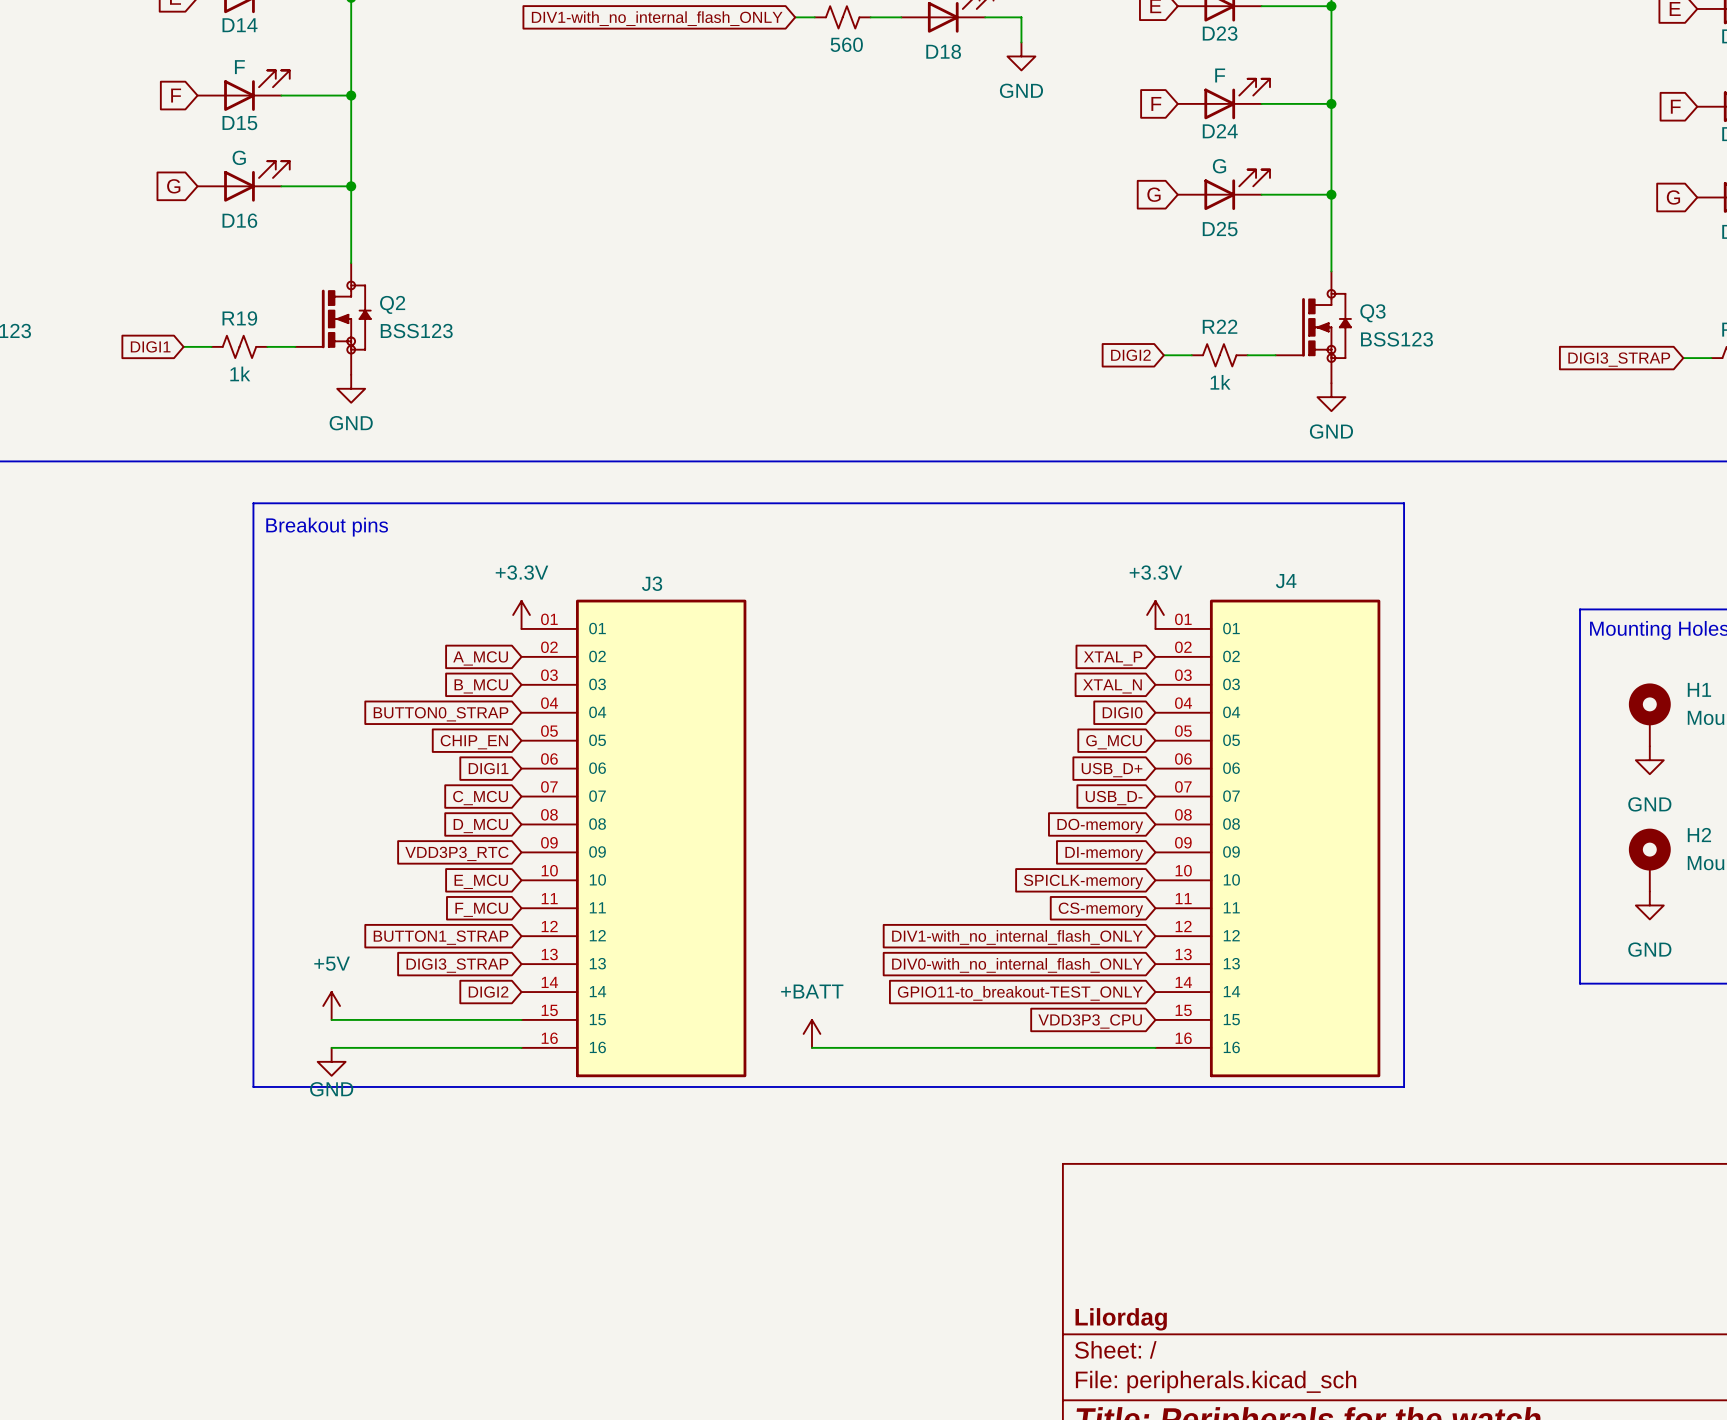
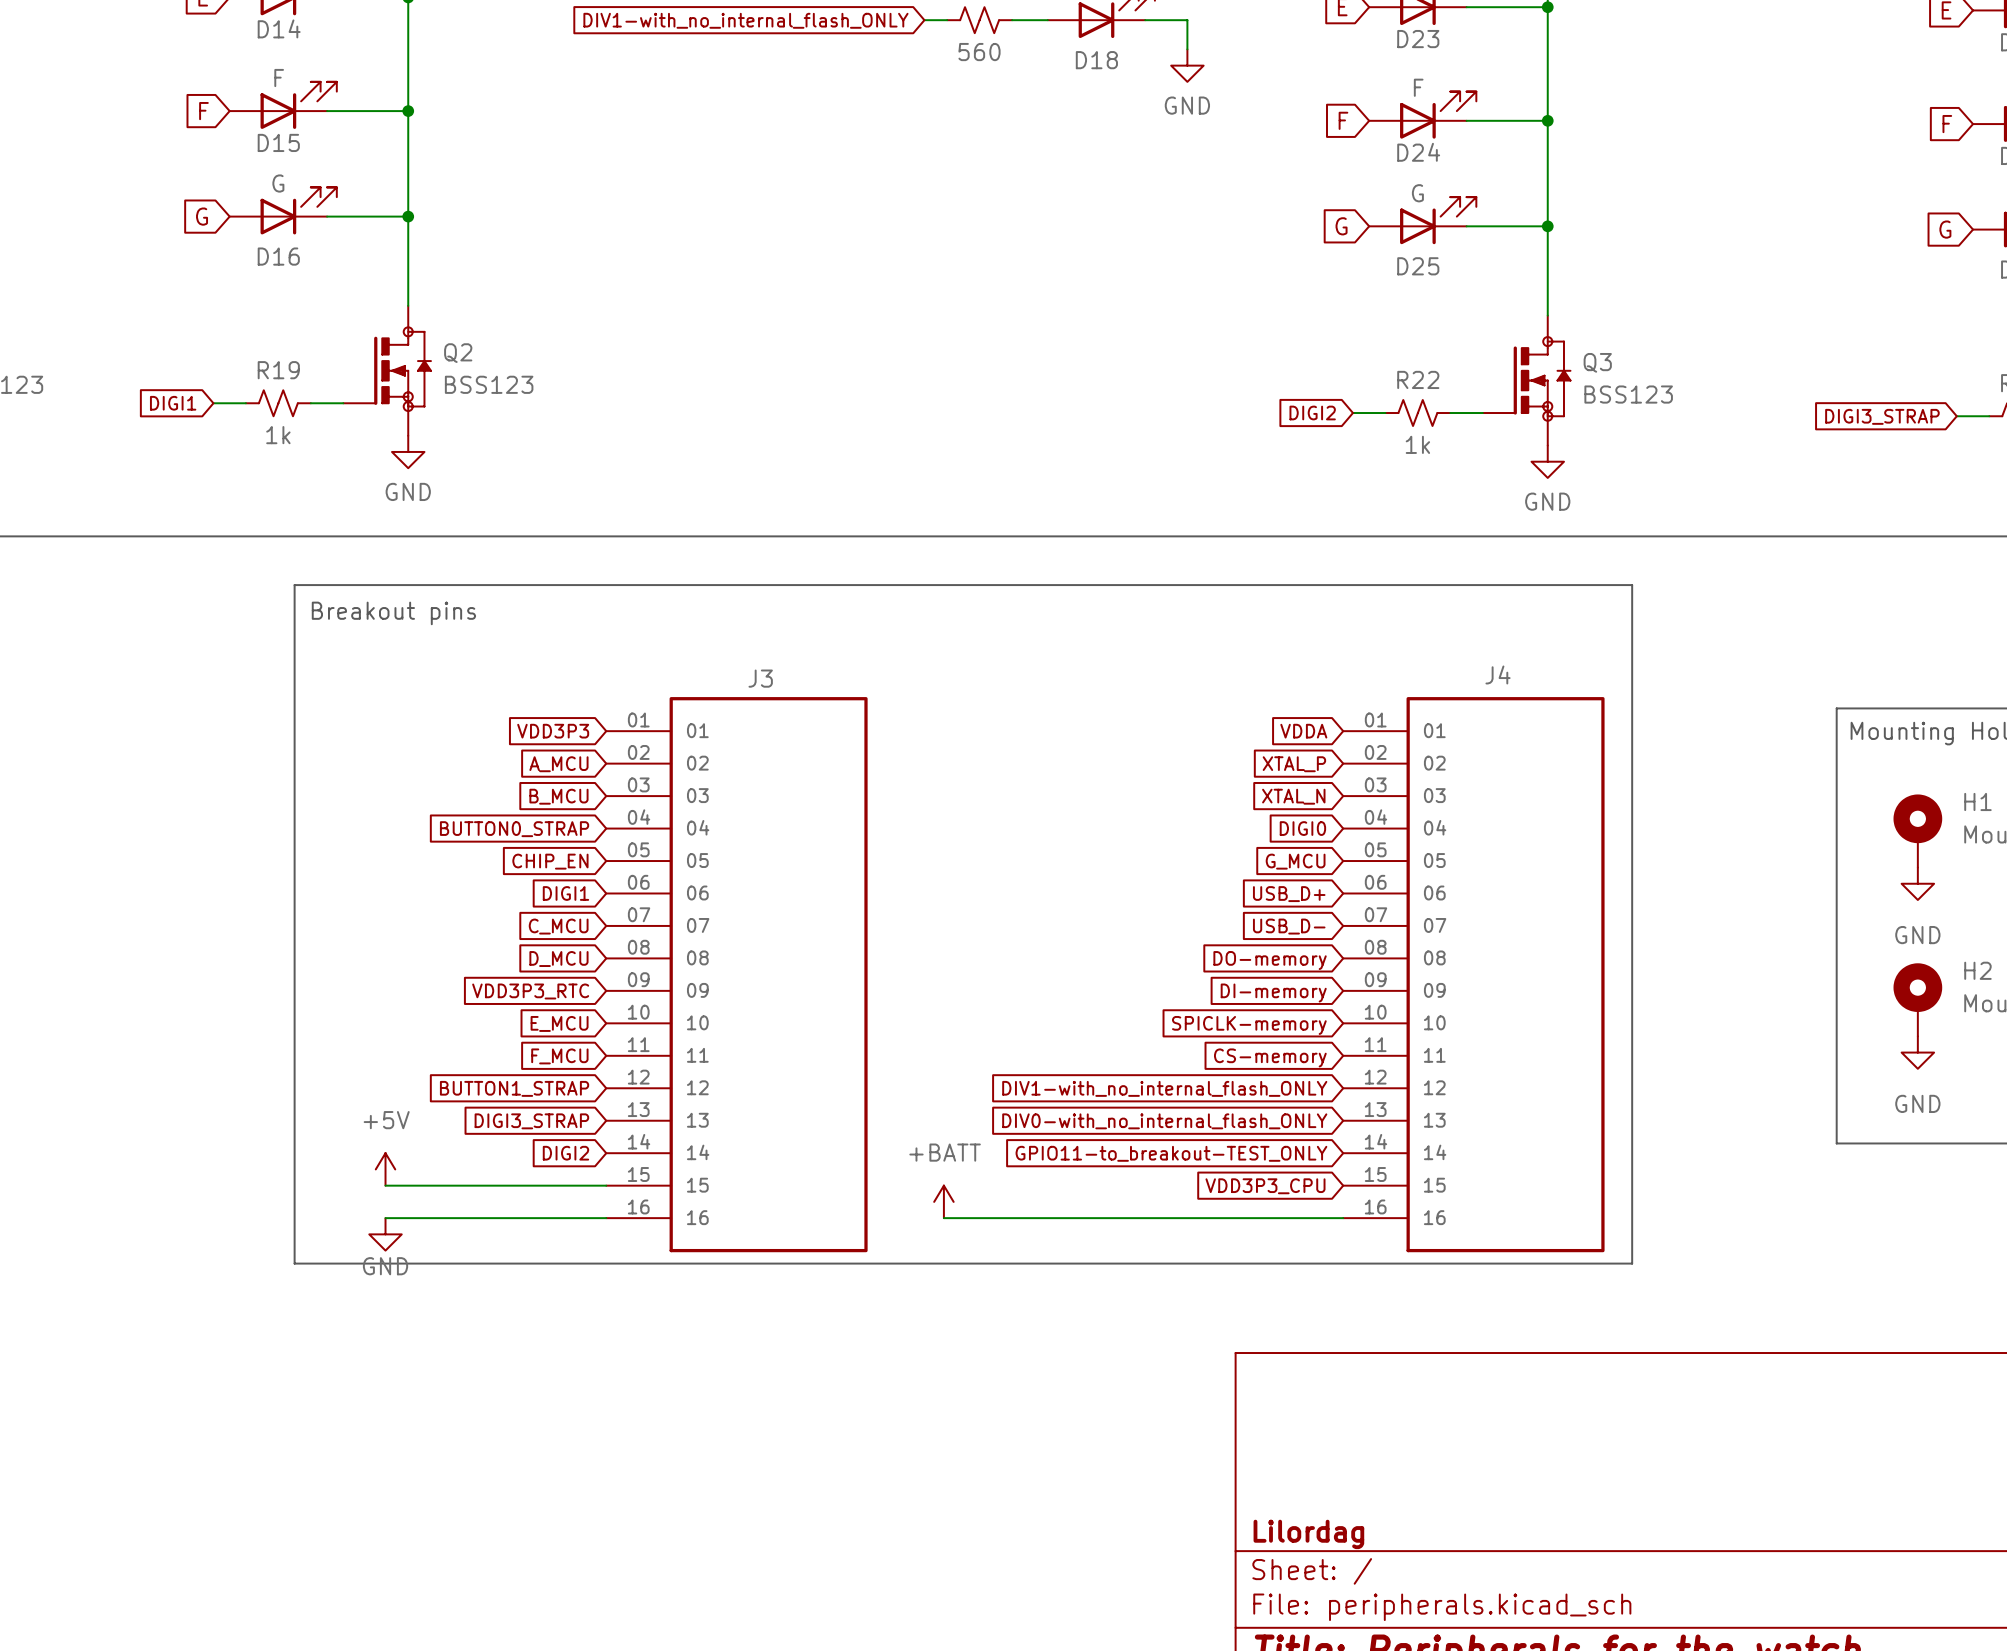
power symbol: +3.3V (521, 615) -> none
power symbol: +3.3V (1155, 615) -> none
global label: none -> VDD3P3 (553, 731)
global label: none -> VDDA (1303, 731)

